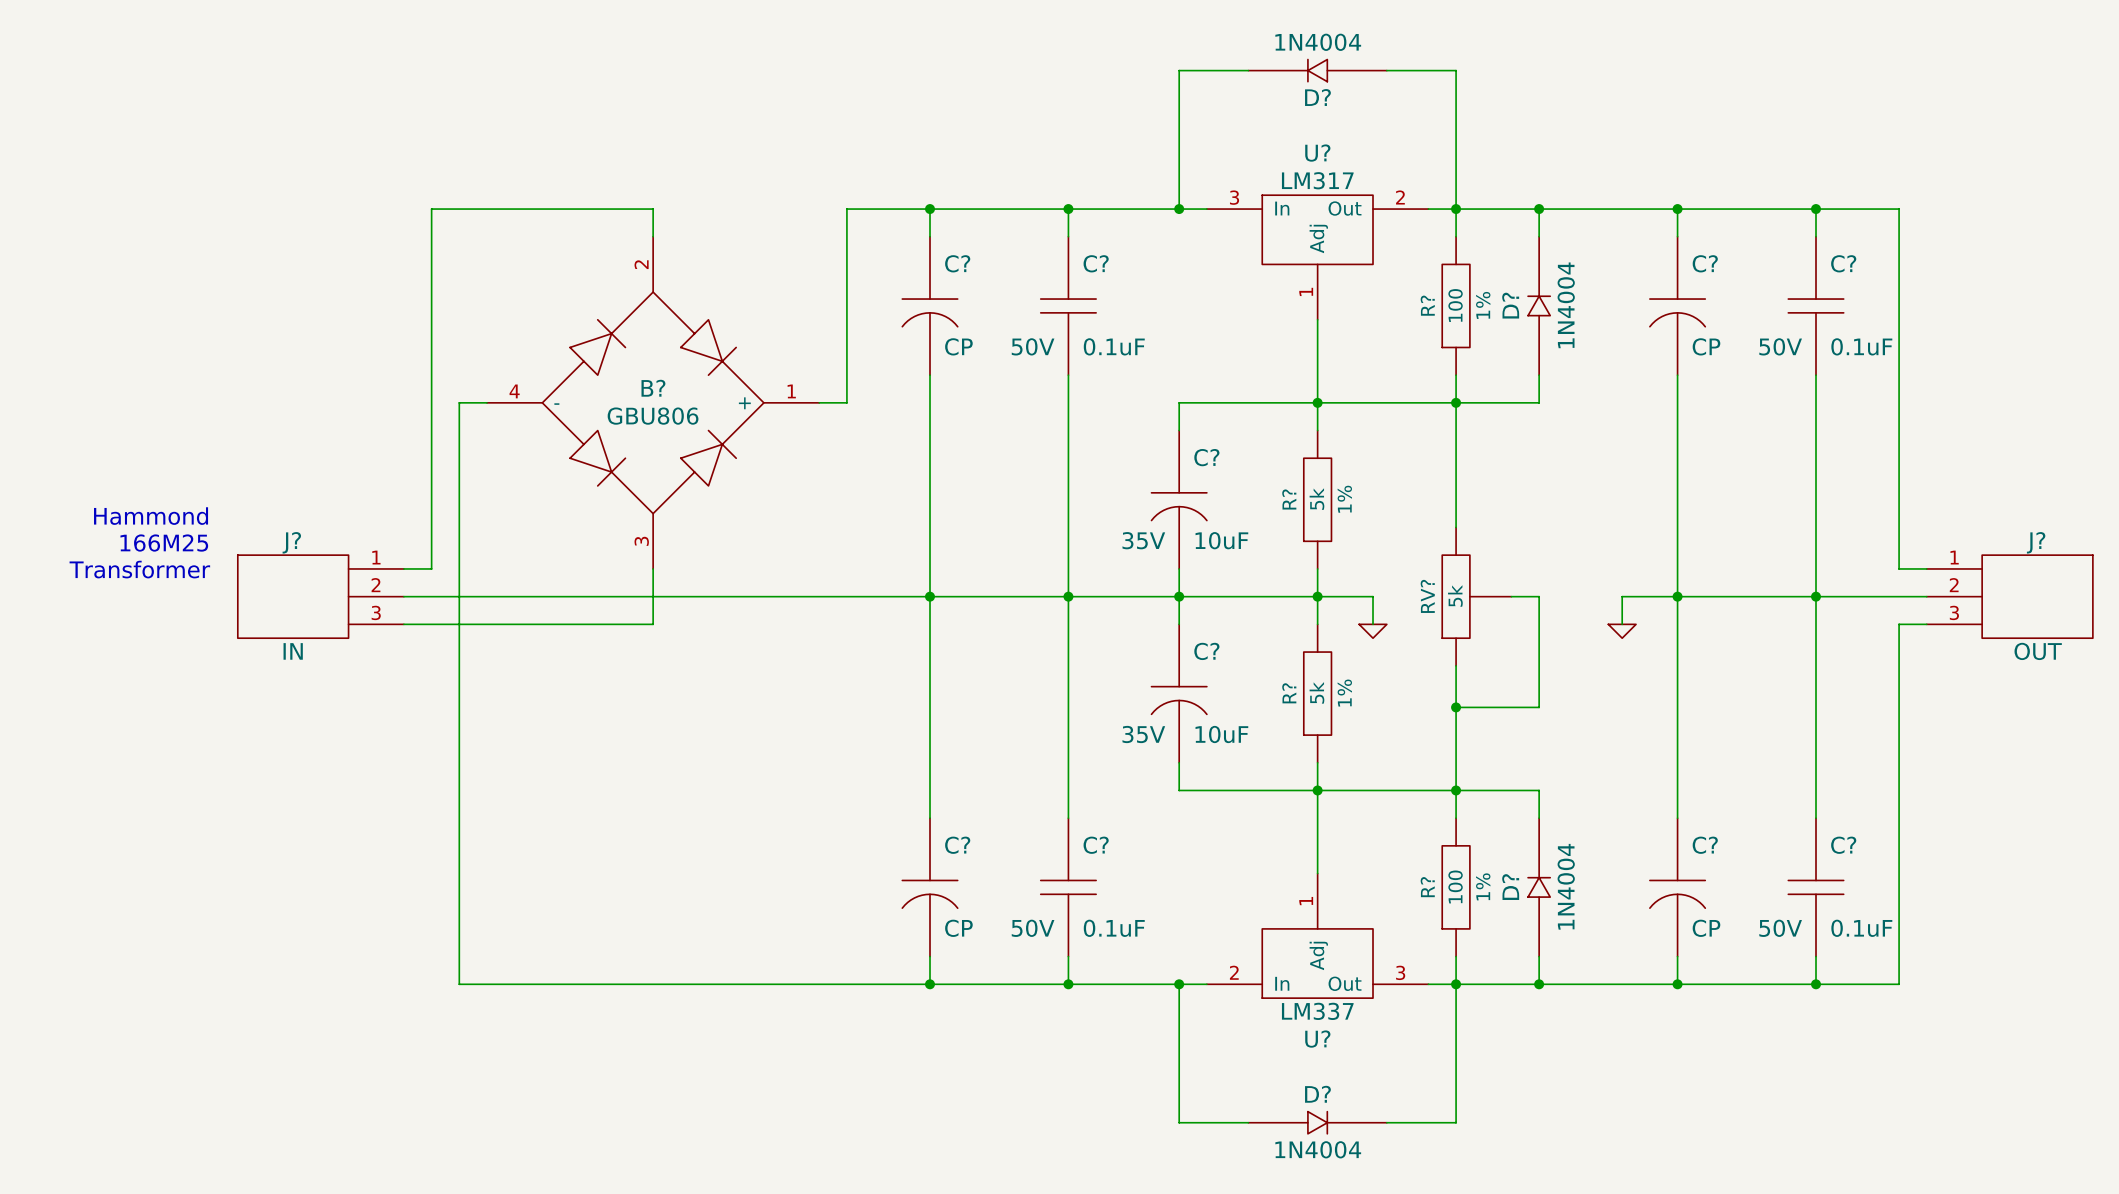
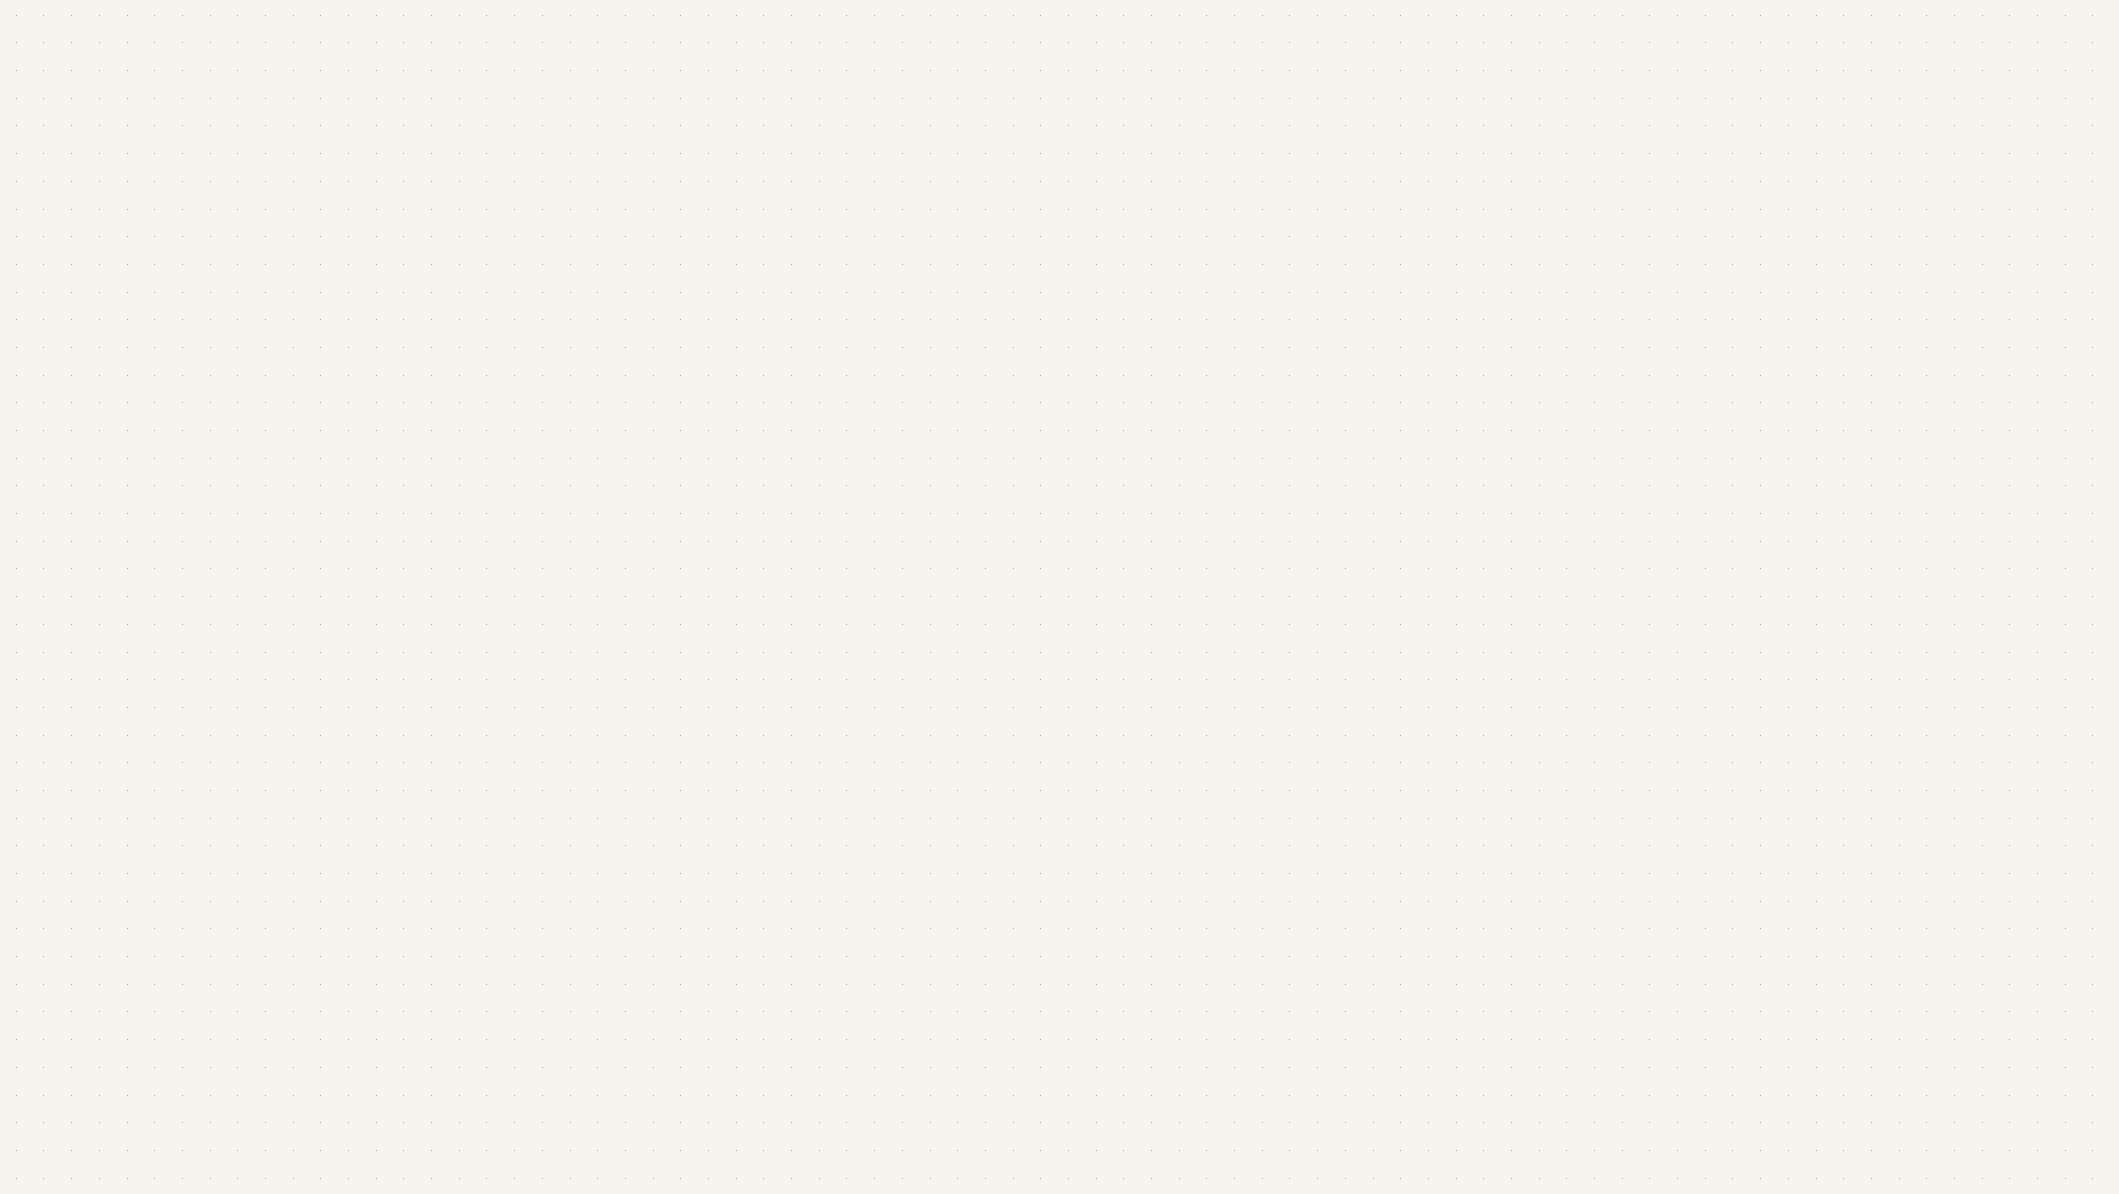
wire: (1248, 70) (1179, 70) (1179, 209) -> none
D?: 1N4004 (1317, 70) -> none
wire: (1386, 70) (1456, 70) (1456, 236) -> none
wire: (930, 209) (930, 236) -> none
junction: (930, 209) -> none
wire: (1068, 209) (1068, 236) -> none
junction: (1068, 209) -> none
junction: (1179, 209) -> none
wire: (1206, 209) (846, 209) (846, 402) (819, 402) -> none
wire: (1428, 209) (1899, 209) (1899, 568) (1926, 568) -> none
junction: (1456, 209) -> none
wire: (1539, 209) (1539, 236) -> none
junction: (1539, 209) -> none
wire: (1677, 209) (1677, 236) -> none
junction: (1677, 209) -> none
wire: (1816, 209) (1816, 236) -> none
junction: (1816, 209) -> none
wire: (653, 236) (653, 209) (431, 209) (431, 568) (403, 568) -> none
U?: LM317 (1317, 257) -> none
C?: CP (930, 305) -> none
C?: 0.1uF (1068, 305) -> none
R?: 100 (1456, 305) -> none
D?: 1N4004 (1539, 305) -> none
C?: CP (1677, 305) -> none
C?: 0.1uF (1816, 305) -> none
wire: (1317, 319) (1317, 430) -> none
wire: (930, 375) (930, 818) -> none
wire: (1068, 375) (1068, 818) -> none
wire: (1456, 375) (1456, 527) -> none
wire: (1539, 375) (1539, 402) (1179, 402) (1179, 430) -> none
wire: (1677, 375) (1677, 818) -> none
wire: (1816, 375) (1816, 818) -> none
wire: (486, 402) (459, 402) (459, 984) (1206, 984) -> none
B?: GBU806 (653, 402) -> none
junction: (1317, 402) -> none
junction: (1456, 402) -> none
C?: 10uF (1179, 499) -> none
R?: 5k (1317, 499) -> none
text: Hammond (151, 516) -> none
text: 166M25 (164, 543) -> none
wire: (653, 568) (653, 624) (403, 624) -> none
wire: (1179, 568) (1179, 624) -> none
wire: (1317, 568) (1317, 624) -> none
text: Transformer (139, 569) -> none
J?: IN (320, 596) -> none
wire: (403, 596) (1373, 596) (1373, 624) -> none
junction: (930, 596) -> none
junction: (1068, 596) -> none
junction: (1179, 596) -> none
junction: (1317, 596) -> none
RV?: 5k (1476, 596) -> none
wire: (1511, 596) (1539, 596) (1539, 707) (1456, 707) -> none
junction: (1677, 596) -> none
junction: (1816, 596) -> none
wire: (1926, 596) (1622, 596) (1622, 624) -> none
J?: OUT (2009, 596) -> none
wire: (1926, 624) (1899, 624) (1899, 984) (1428, 984) -> none
power symbol: (1373, 631) -> none
power symbol: (1622, 631) -> none
wire: (1456, 665) (1456, 818) -> none
C?: 10uF (1179, 693) -> none
R?: 5k (1317, 693) -> none
junction: (1456, 707) -> none
wire: (1179, 762) (1179, 790) (1539, 790) (1539, 818) -> none
wire: (1317, 762) (1317, 873) -> none
junction: (1317, 790) -> none
junction: (1456, 790) -> none
C?: CP (930, 887) -> none
C?: 0.1uF (1068, 887) -> none
R?: 100 (1456, 887) -> none
D?: 1N4004 (1539, 887) -> none
C?: CP (1677, 887) -> none
C?: 0.1uF (1816, 887) -> none
U?: LM337 (1317, 935) -> none
wire: (930, 956) (930, 984) -> none
wire: (1068, 956) (1068, 984) -> none
wire: (1456, 956) (1456, 1122) (1386, 1122) -> none
wire: (1539, 956) (1539, 984) -> none
wire: (1677, 956) (1677, 984) -> none
wire: (1816, 956) (1816, 984) -> none
junction: (930, 984) -> none
junction: (1068, 984) -> none
wire: (1179, 984) (1179, 1122) (1248, 1122) -> none
junction: (1179, 984) -> none
junction: (1456, 984) -> none
junction: (1539, 984) -> none
junction: (1677, 984) -> none
junction: (1816, 984) -> none
D?: 1N4004 (1317, 1122) -> none

